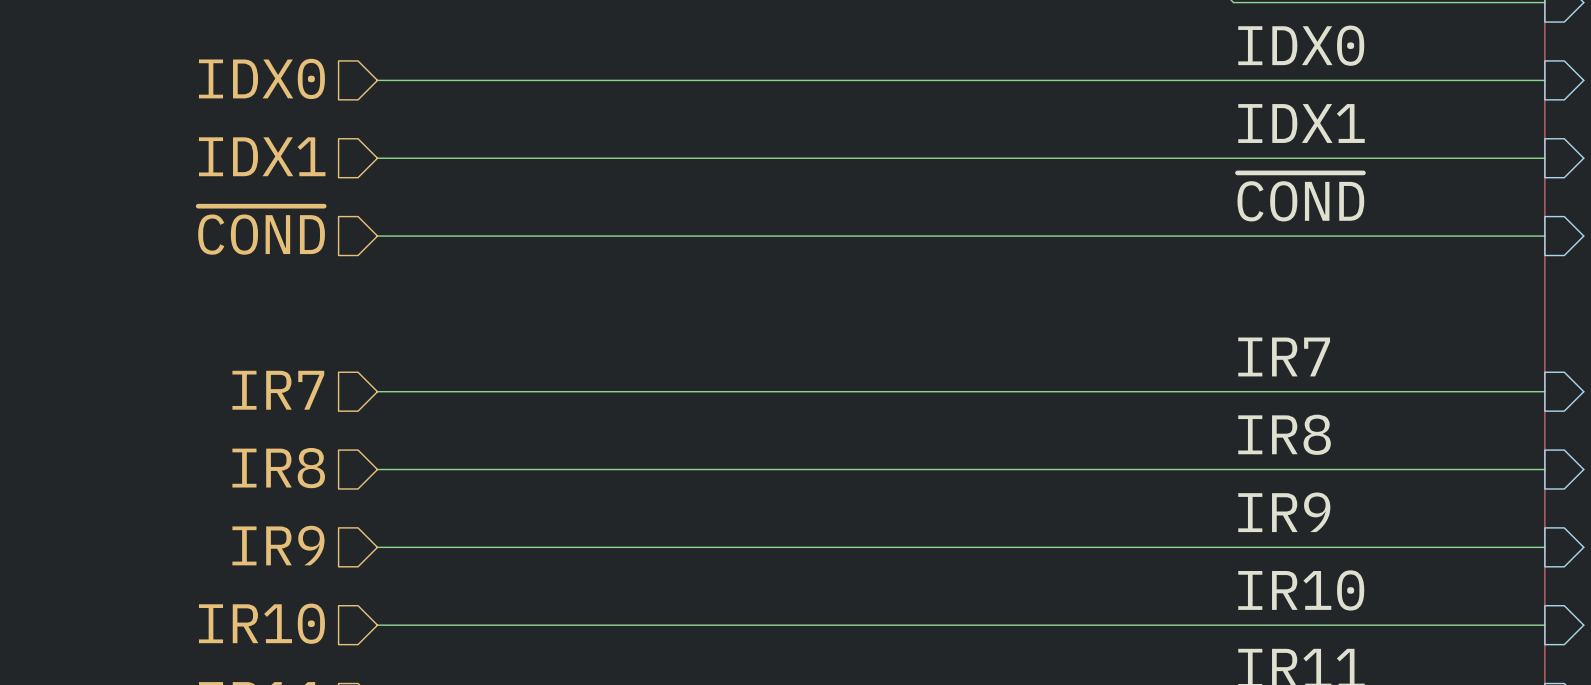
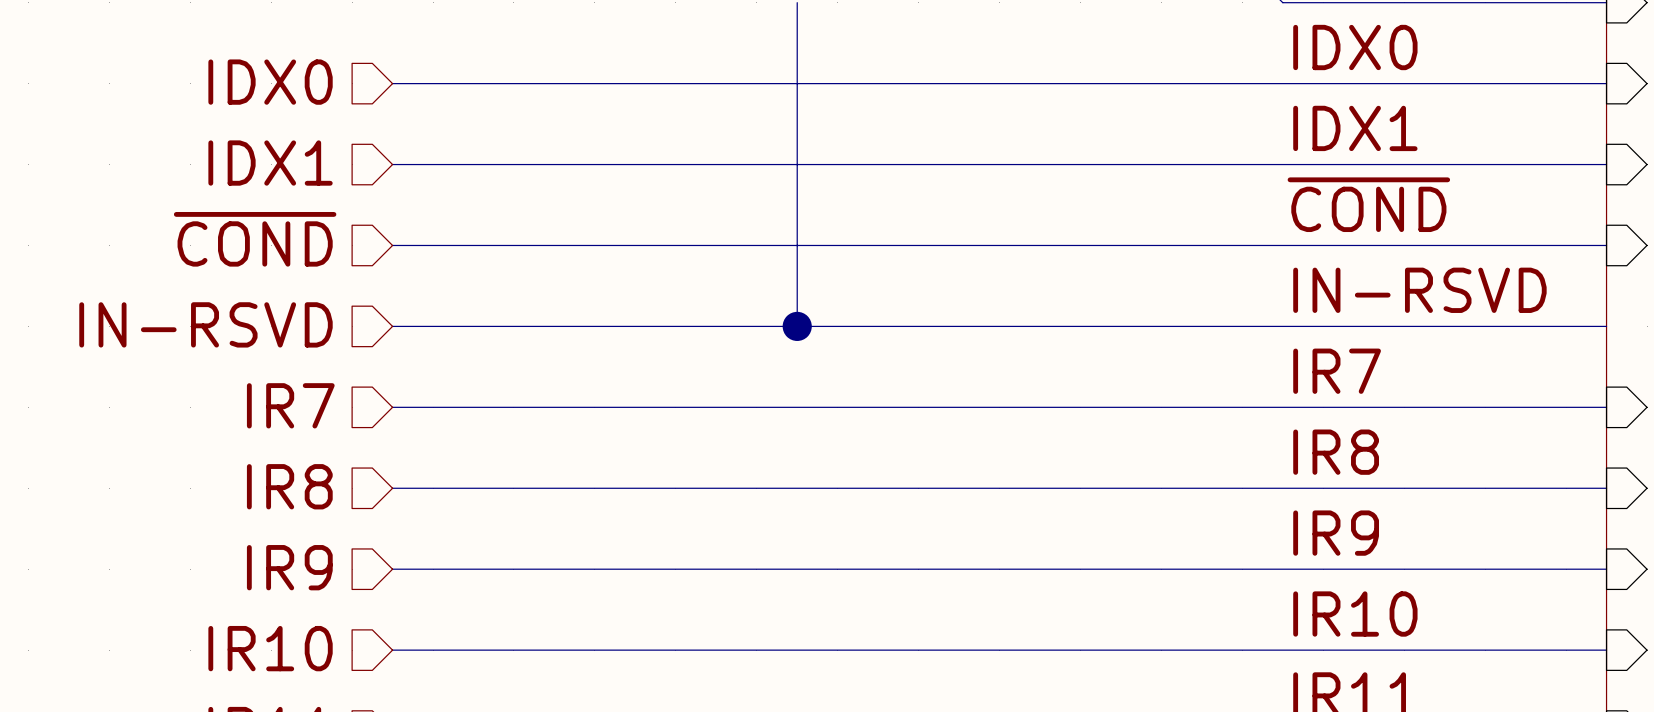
wire: none -> (797, 2) (797, 326)
label: none -> IN-RSVD (1419, 290)
hierarchical label: none -> IN-RSVD (205, 324)
wire: none -> (392, 326) (1606, 326)
junction: none -> (797, 326)

